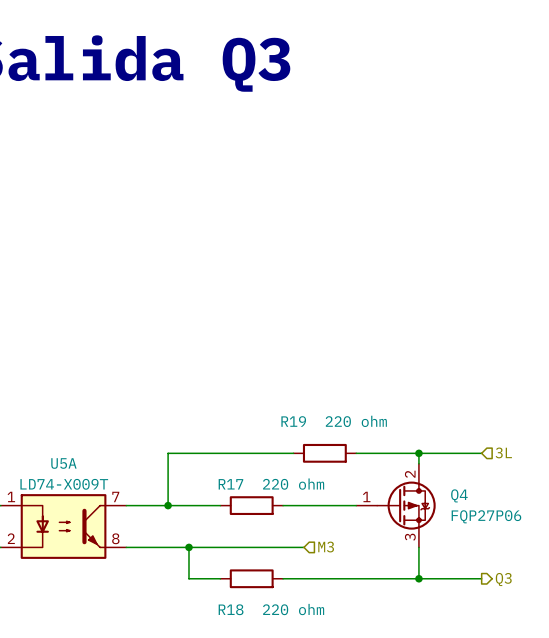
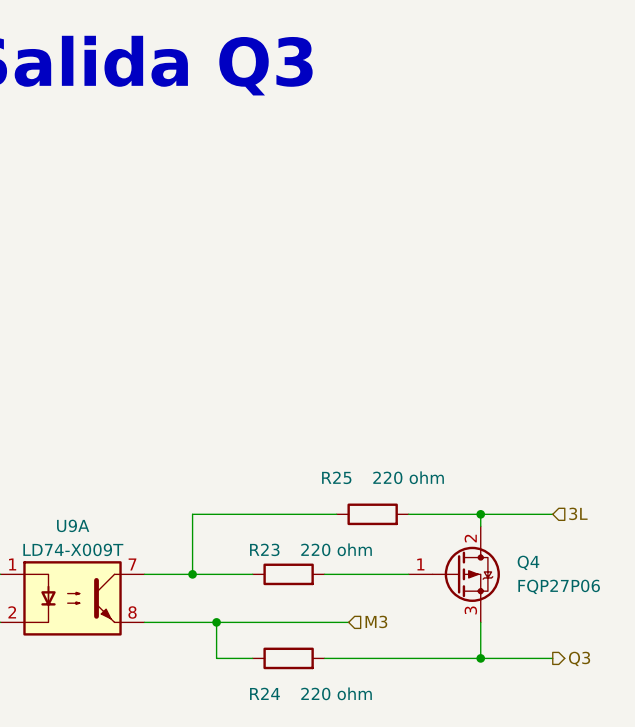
R19 name: R19 (293, 421) -> R25 (336, 477)
U5A name: U5A (63, 463) -> U9A (73, 525)
R17 name: R17 (230, 484) -> R23 (264, 549)
R18 name: R18 (231, 609) -> R24 (264, 693)

